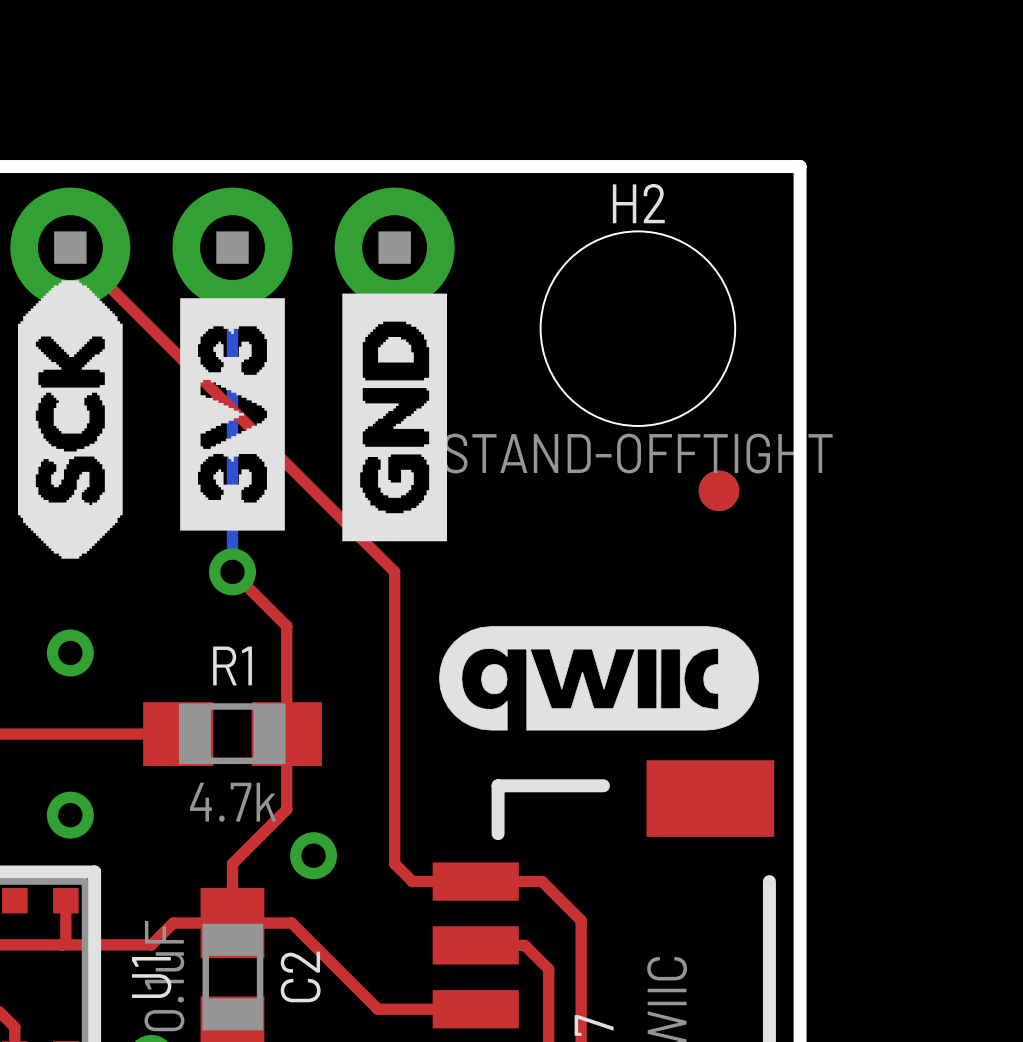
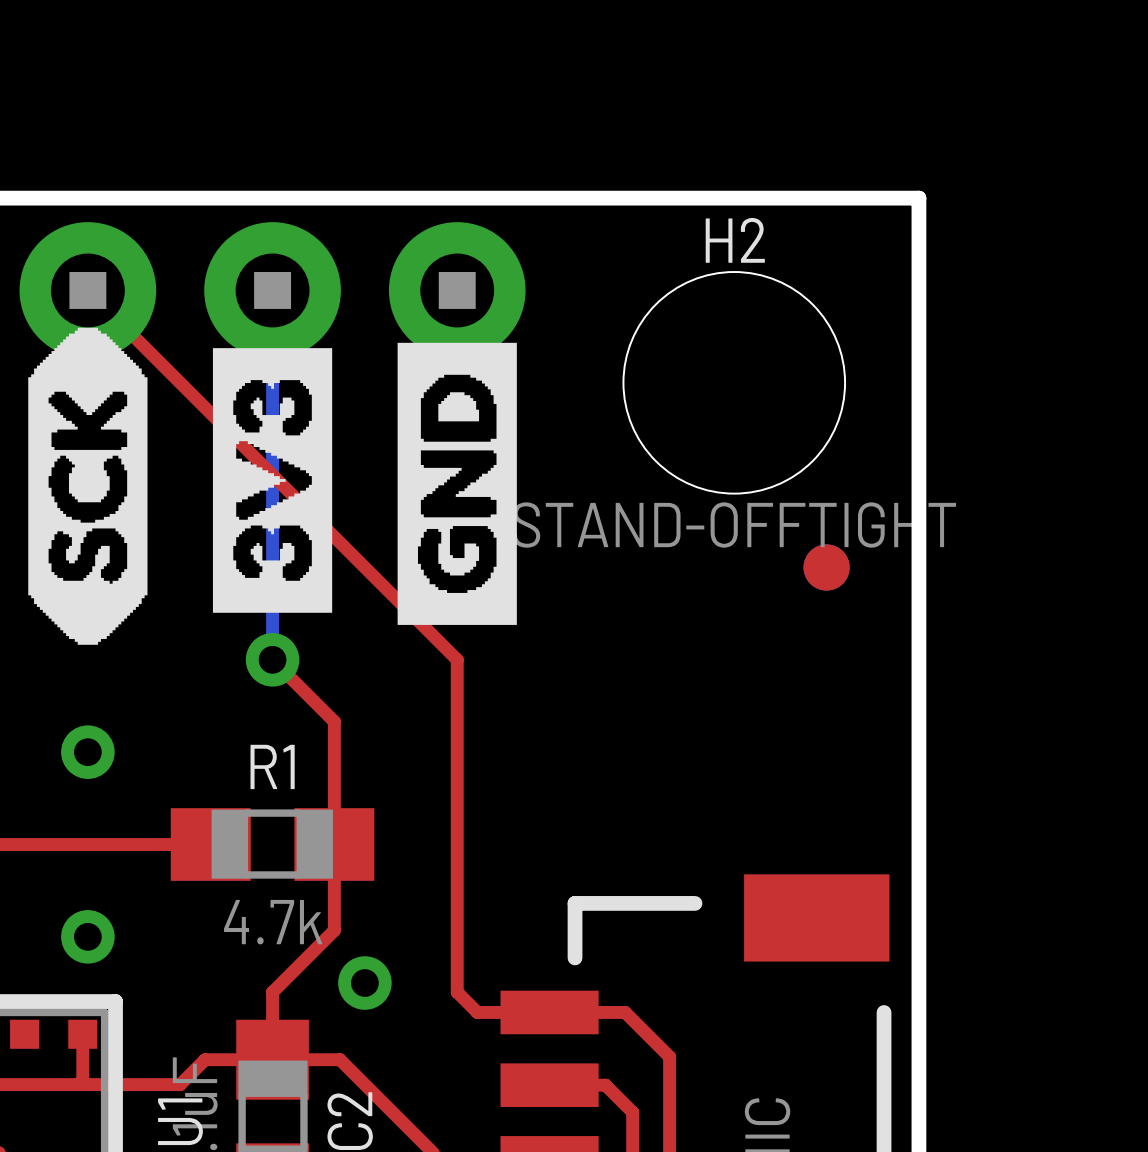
drawing: [439, 626, 759, 731] -> none

